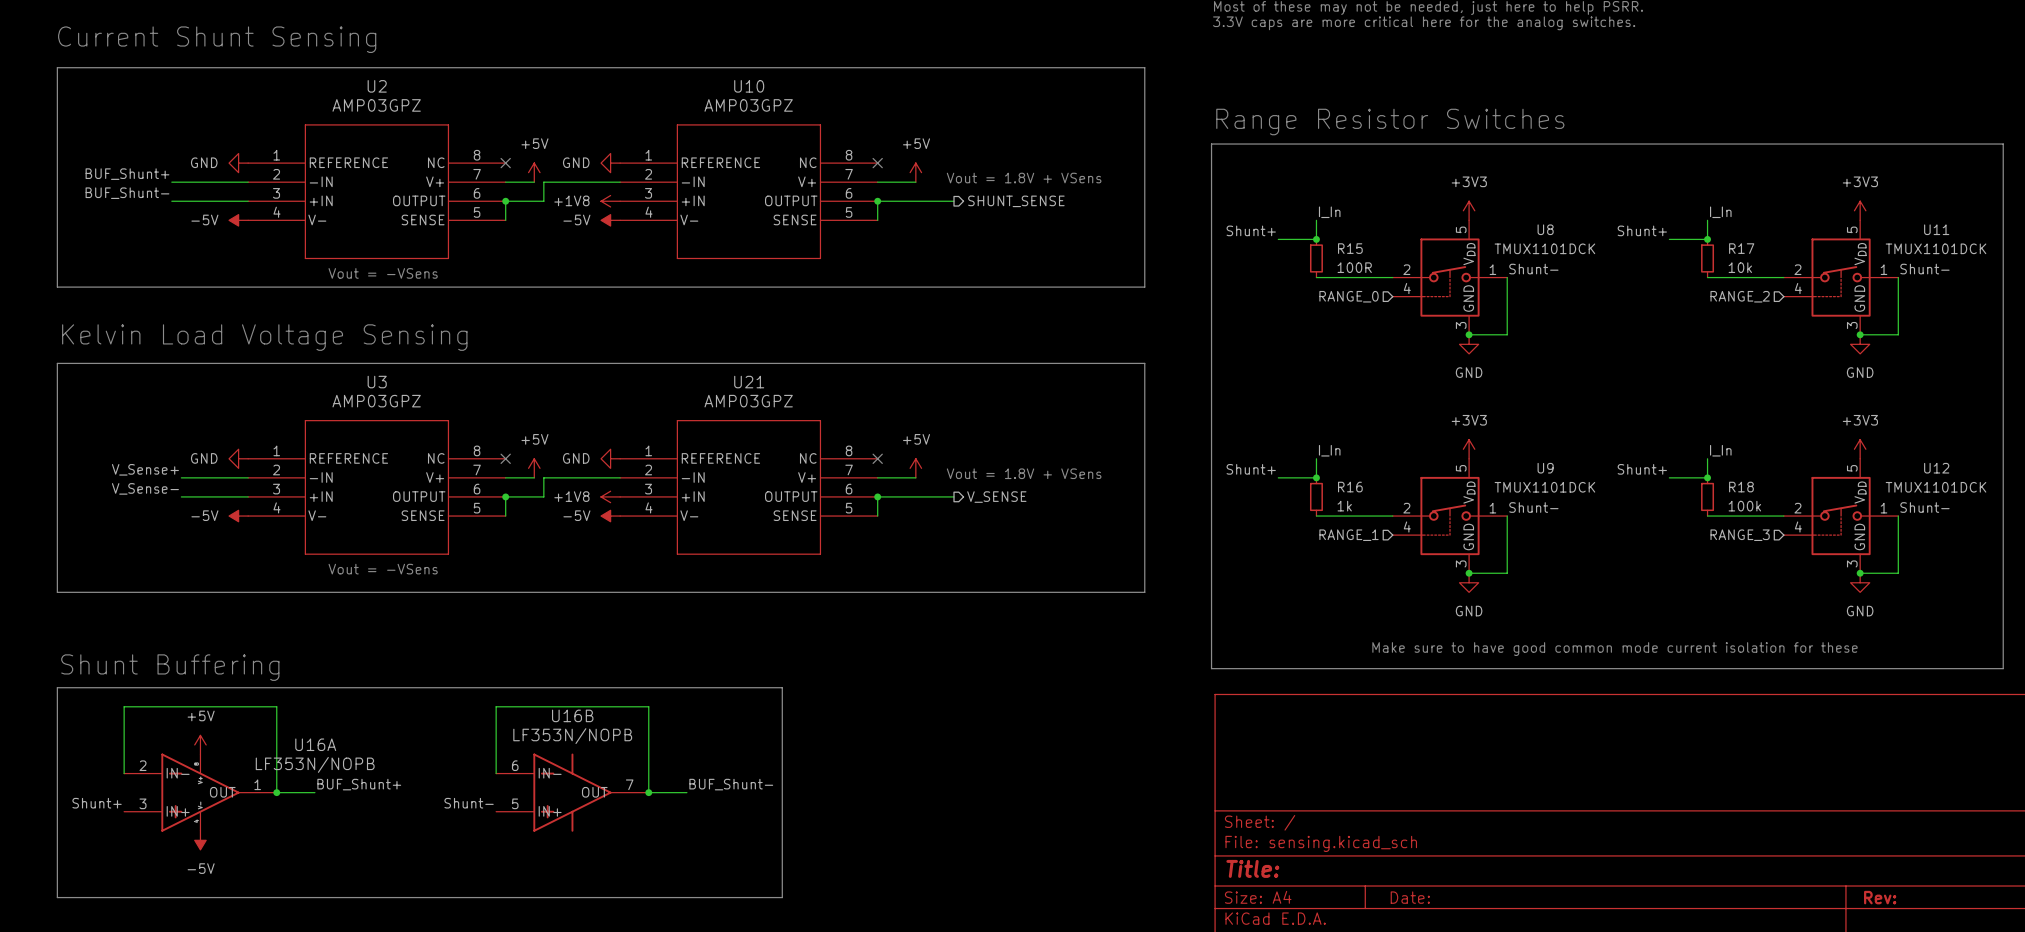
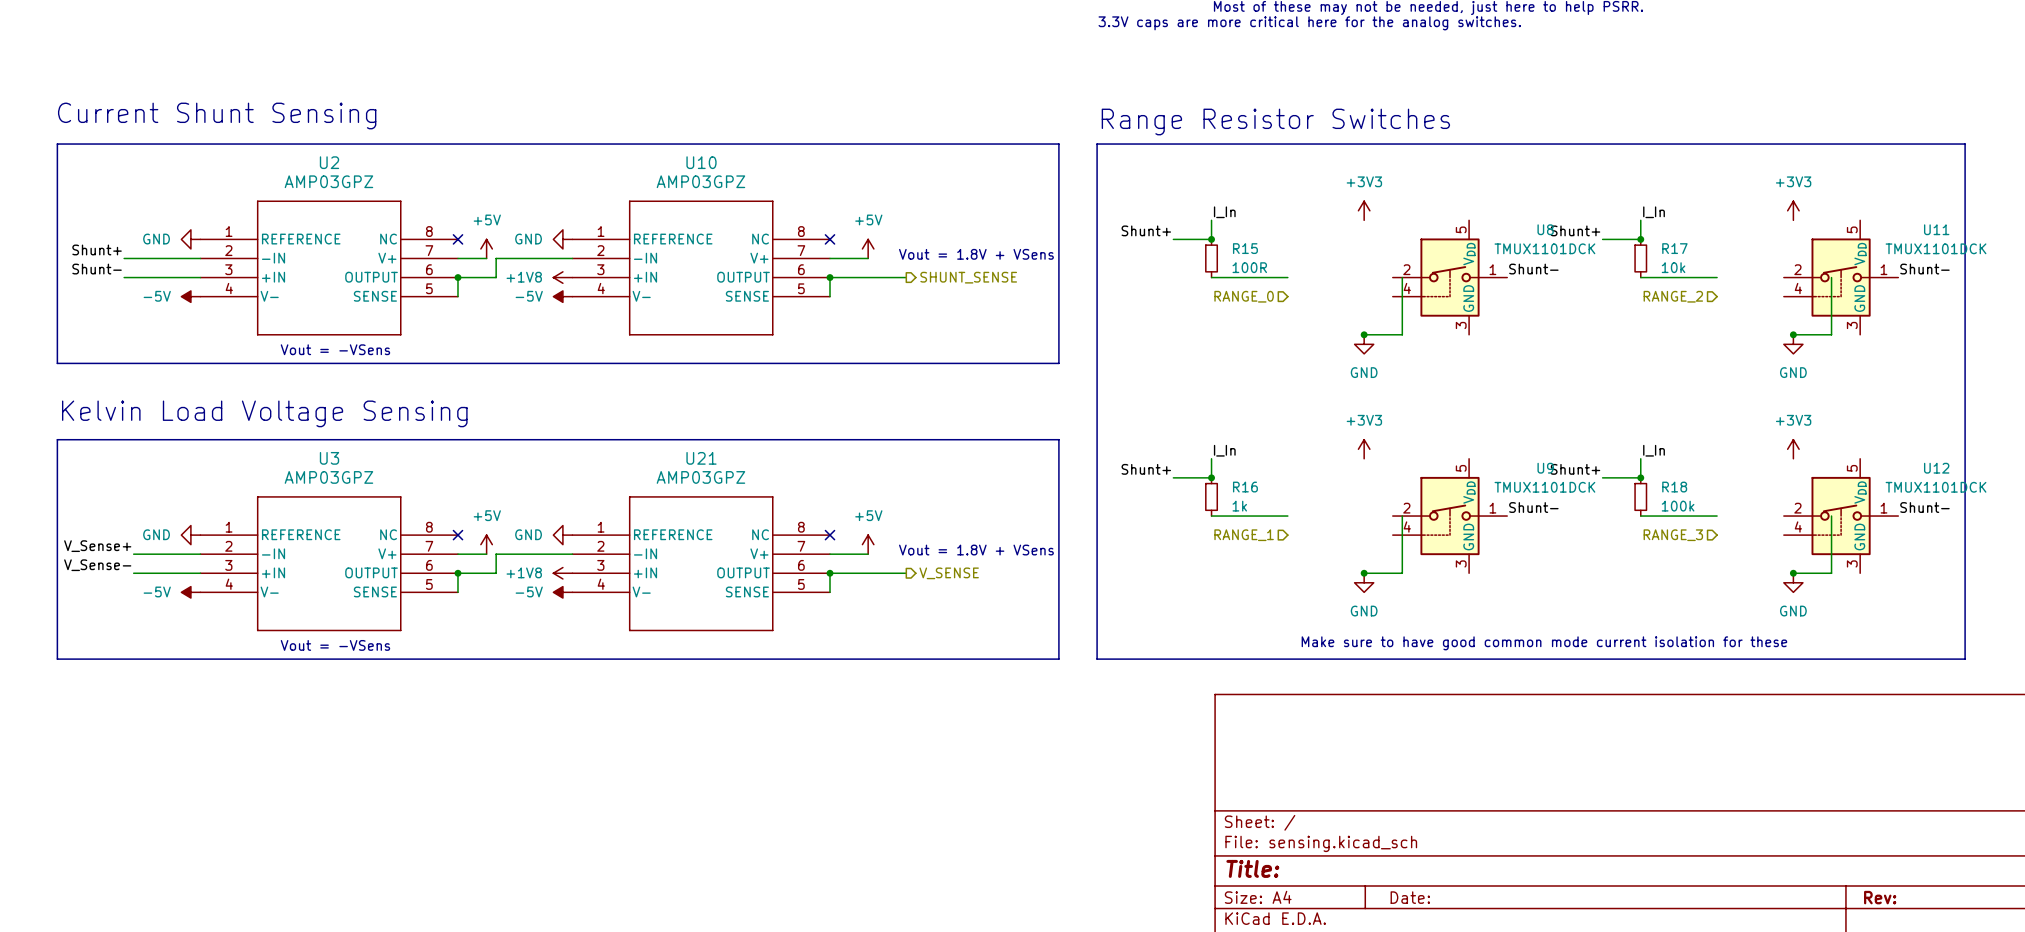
text position: 3.3V caps are more critical here for the analog switches. (1424, 23) -> 3.3V caps are more critical here for the analog switches. (1309, 23)
text position: Current Shunt Sensing (217, 39) -> Current Shunt Sensing (217, 115)
text position: Range Resistor Switches (1390, 122) -> Range Resistor Switches (1275, 122)
line: (57, 144) (57, 67) (1144, 67) (1144, 287) (57, 287) -> none
line: (1211, 144) (1211, 668) (2003, 668) (2003, 144) (1965, 144) -> (1211, 144) (1097, 144) (1097, 659) (1965, 659) (1965, 144)
power symbol position: GND (238, 163) -> GND (190, 239)
no-connect mark: (505, 163) -> none
power symbol position: GND (610, 163) -> GND (562, 239)
no-connect mark: (877, 163) -> none
power symbol position: +5V (534, 172) -> +5V (486, 248)
power symbol position: +5V (915, 172) -> +5V (868, 248)
label: BUF_Shunt+ (127, 174) -> none
text position: Vout = 1.8V + VSens (1024, 178) -> Vout = 1.8V + VSens (976, 254)
wire: (171, 182) (248, 182) -> (124, 258) (200, 258)
wire: (505, 182) (534, 182) -> (457, 258) (486, 258)
wire: (620, 182) (543, 182) (543, 201) (505, 201) (505, 220) -> (572, 258) (496, 258) (496, 277) (457, 277) (457, 296)
wire: (877, 182) (915, 182) -> (829, 258) (868, 258)
U2 position: (376, 191) -> (329, 268)
U10 position: (748, 191) -> (701, 268)
label: BUF_Shunt- (127, 193) -> none
wire: (171, 201) (248, 201) -> (124, 277) (200, 277)
junction: (505, 201) -> none
power symbol position: +1V8 (610, 201) -> +1V8 (562, 277)
junction: (877, 201) -> none
wire: (953, 201) (877, 201) (877, 220) -> (906, 277) (829, 277) (829, 296)
hierarchical label position: SHUNT_SENSE (1016, 201) -> SHUNT_SENSE (968, 277)
power symbol position: +3V3 (1469, 210) -> +3V3 (1364, 210)
power symbol position: +3V3 (1860, 210) -> +3V3 (1793, 210)
label position: I_In (1329, 212) -> I_In (1224, 212)
label position: I_In (1720, 212) -> I_In (1654, 212)
power symbol position: -5V (238, 220) -> -5V (190, 296)
power symbol position: -5V (610, 220) -> -5V (562, 296)
wire: (1316, 220) (1316, 239) (1278, 239) -> (1211, 220) (1211, 239) (1173, 239)
wire: (1707, 220) (1707, 239) (1669, 239) -> (1640, 220) (1640, 239) (1602, 239)
label position: Shunt+ (1251, 230) -> Shunt+ (1146, 230)
label position: Shunt+ (1642, 230) -> Shunt+ (1575, 230)
no-connect mark: none -> (457, 239)
no-connect mark: none -> (829, 239)
junction: none -> (1211, 239)
junction: (1316, 239) -> none
junction: none -> (1640, 239)
junction: (1707, 239) -> none
label: none -> Shunt+ (97, 249)
R15 position: (1316, 258) -> (1211, 258)
R17 position: (1707, 258) -> (1640, 258)
label: none -> Shunt- (97, 269)
text position: Vout = -VSens (383, 273) -> Vout = -VSens (335, 349)
junction: none -> (457, 277)
junction: none -> (829, 277)
wire: (1316, 277) (1392, 277) -> (1211, 277) (1287, 277)
wire: (1507, 277) (1507, 334) (1469, 334) -> (1402, 277) (1402, 334) (1364, 334)
wire: (1717, 277) (1783, 277) -> (1640, 277) (1707, 277)
wire: (1898, 277) (1898, 334) (1860, 334) -> (1831, 277) (1831, 334) (1793, 334)
hierarchical label position: RANGE_0 (1349, 296) -> RANGE_0 (1244, 296)
hierarchical label position: RANGE_2 (1740, 296) -> RANGE_2 (1673, 296)
junction: none -> (1364, 334)
junction: (1469, 334) -> none
junction: none -> (1793, 334)
junction: (1860, 334) -> none
text position: Kelvin Load Voltage Sensing (264, 337) -> Kelvin Load Voltage Sensing (264, 413)
power symbol position: GND (1469, 344) -> GND (1364, 344)
power symbol position: GND (1860, 344) -> GND (1793, 344)
line: (57, 363) (57, 439) -> (57, 363) (57, 287)
line: (1058, 363) (1144, 363) (1144, 592) (57, 592) -> (1058, 363) (1058, 144) (57, 144)
line: none -> (57, 439) (1058, 439) (1058, 659) (57, 659) (57, 592)
power symbol position: +3V3 (1469, 449) -> +3V3 (1364, 449)
power symbol position: +3V3 (1860, 449) -> +3V3 (1793, 449)
label position: I_In (1329, 450) -> I_In (1224, 450)
label position: I_In (1720, 450) -> I_In (1654, 450)
power symbol position: GND (238, 458) -> GND (190, 535)
no-connect mark: (505, 458) -> none
power symbol position: GND (610, 458) -> GND (562, 535)
no-connect mark: (877, 458) -> none
wire: (1316, 458) (1316, 477) (1278, 477) -> (1211, 458) (1211, 477) (1173, 477)
wire: (1707, 458) (1707, 477) (1669, 477) -> (1640, 458) (1640, 477) (1602, 477)
power symbol position: +5V (534, 468) -> +5V (486, 544)
power symbol position: +5V (915, 468) -> +5V (868, 544)
label position: V_Sense+ (145, 469) -> V_Sense+ (97, 546)
label position: Shunt+ (1251, 469) -> Shunt+ (1146, 469)
label position: Shunt+ (1642, 469) -> Shunt+ (1575, 469)
text position: Vout = 1.8V + VSens (1024, 473) -> Vout = 1.8V + VSens (976, 550)
wire: (181, 477) (248, 477) -> (133, 554) (200, 554)
wire: (505, 477) (534, 477) -> (457, 554) (486, 554)
wire: (620, 477) (543, 477) (543, 496) (505, 496) (505, 516) -> (572, 554) (496, 554) (496, 573) (457, 573) (457, 592)
wire: (877, 477) (915, 477) -> (829, 554) (868, 554)
junction: none -> (1211, 477)
junction: (1316, 477) -> none
junction: none -> (1640, 477)
junction: (1707, 477) -> none
U3 position: (376, 487) -> (329, 563)
U21 position: (748, 487) -> (701, 563)
label position: V_Sense- (145, 488) -> V_Sense- (97, 565)
wire: (181, 496) (248, 496) -> (133, 573) (200, 573)
junction: (505, 496) -> none
power symbol position: +1V8 (610, 496) -> +1V8 (562, 573)
junction: (877, 496) -> none
wire: (953, 496) (877, 496) (877, 516) -> (906, 573) (829, 573) (829, 592)
R16 position: (1316, 496) -> (1211, 496)
R18 position: (1707, 496) -> (1640, 496)
hierarchical label position: V_SENSE (996, 497) -> V_SENSE (949, 573)
power symbol position: -5V (238, 516) -> -5V (190, 592)
power symbol position: -5V (610, 516) -> -5V (562, 592)
wire: (1316, 516) (1392, 516) -> (1211, 516) (1287, 516)
wire: (1507, 516) (1507, 573) (1469, 573) -> (1402, 516) (1402, 573) (1364, 573)
wire: (1717, 516) (1783, 516) -> (1640, 516) (1707, 516)
wire: (1898, 516) (1898, 573) (1860, 573) -> (1831, 516) (1831, 573) (1793, 573)
no-connect mark: none -> (457, 535)
no-connect mark: none -> (829, 535)
hierarchical label position: RANGE_1 (1349, 535) -> RANGE_1 (1244, 535)
hierarchical label position: RANGE_3 (1740, 535) -> RANGE_3 (1673, 535)
text position: Vout = -VSens (383, 569) -> Vout = -VSens (335, 645)
junction: none -> (457, 573)
junction: none -> (829, 573)
junction: none -> (1364, 573)
junction: (1469, 573) -> none
junction: none -> (1793, 573)
junction: (1860, 573) -> none
power symbol position: GND (1469, 582) -> GND (1364, 582)
power symbol position: GND (1860, 582) -> GND (1793, 582)
text position: Make sure to have good common mode current isolation for these (1615, 649) -> Make sure to have good common mode current isolation for these (1544, 643)
text: Shunt Buffering (170, 667) -> none
line: (57, 687) (57, 897) (782, 897) (782, 687) (57, 687) -> none
power symbol: +5V (200, 744) -> none
wire: (124, 773) (124, 706) (276, 706) (276, 792) (314, 792) -> none
wire: (496, 773) (496, 706) (648, 706) (648, 792) (686, 792) -> none
label: BUF_Shunt+ (359, 784) -> none
label: BUF_Shunt- (731, 784) -> none
U16A: LF353N/NOPB (200, 792) -> none
junction: (276, 792) -> none
U16B: LF353N/NOPB (572, 792) -> none
junction: (648, 792) -> none
label: Shunt+ (97, 803) -> none
label: Shunt- (469, 803) -> none
power symbol: -5V (200, 840) -> none

